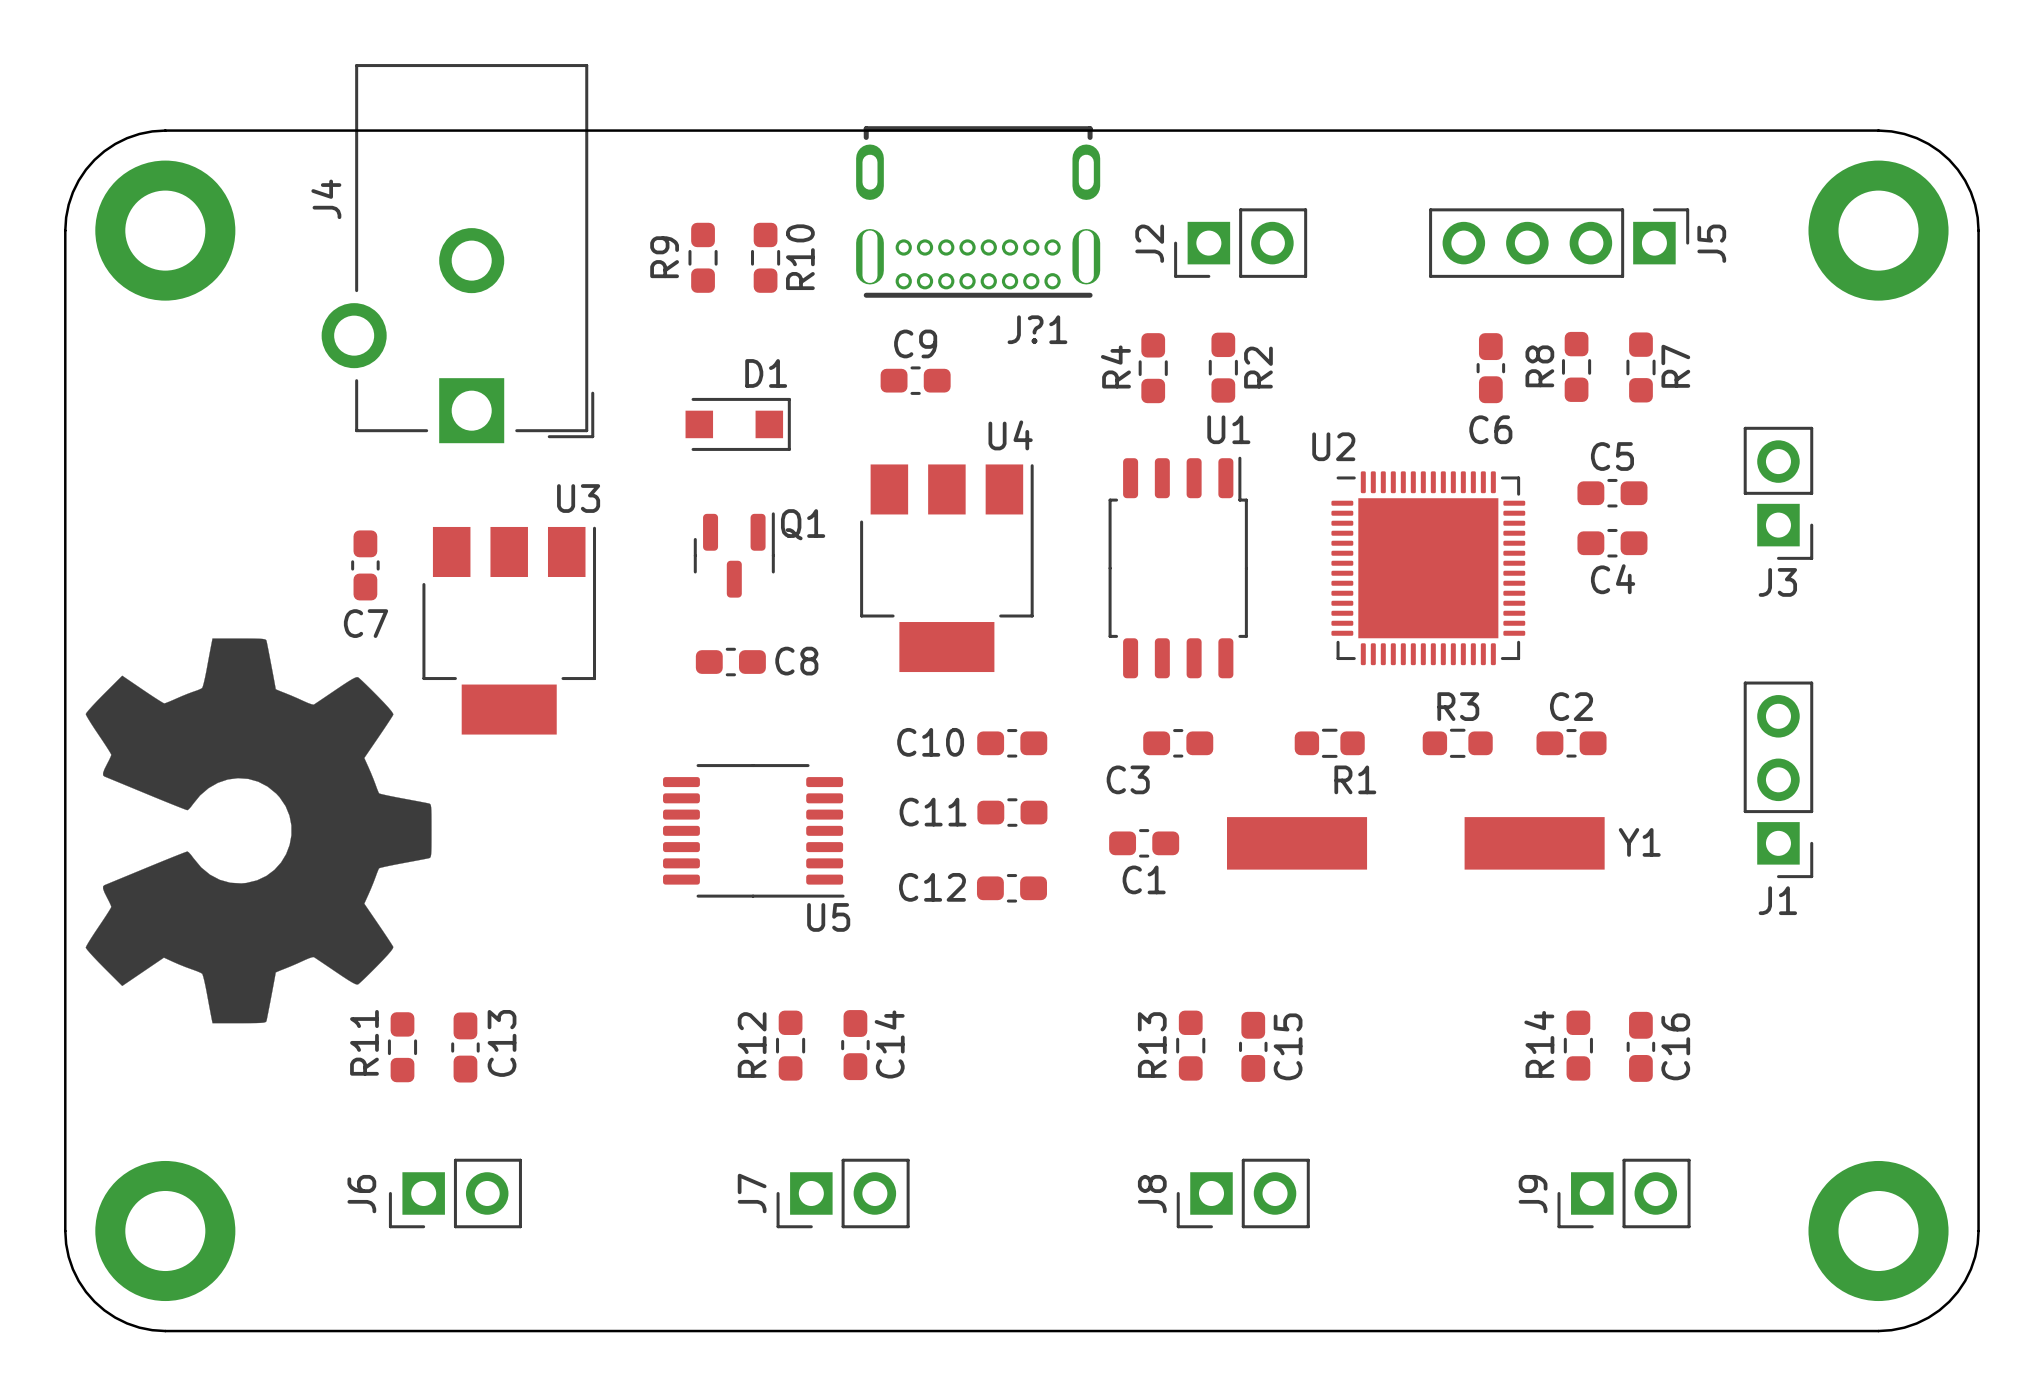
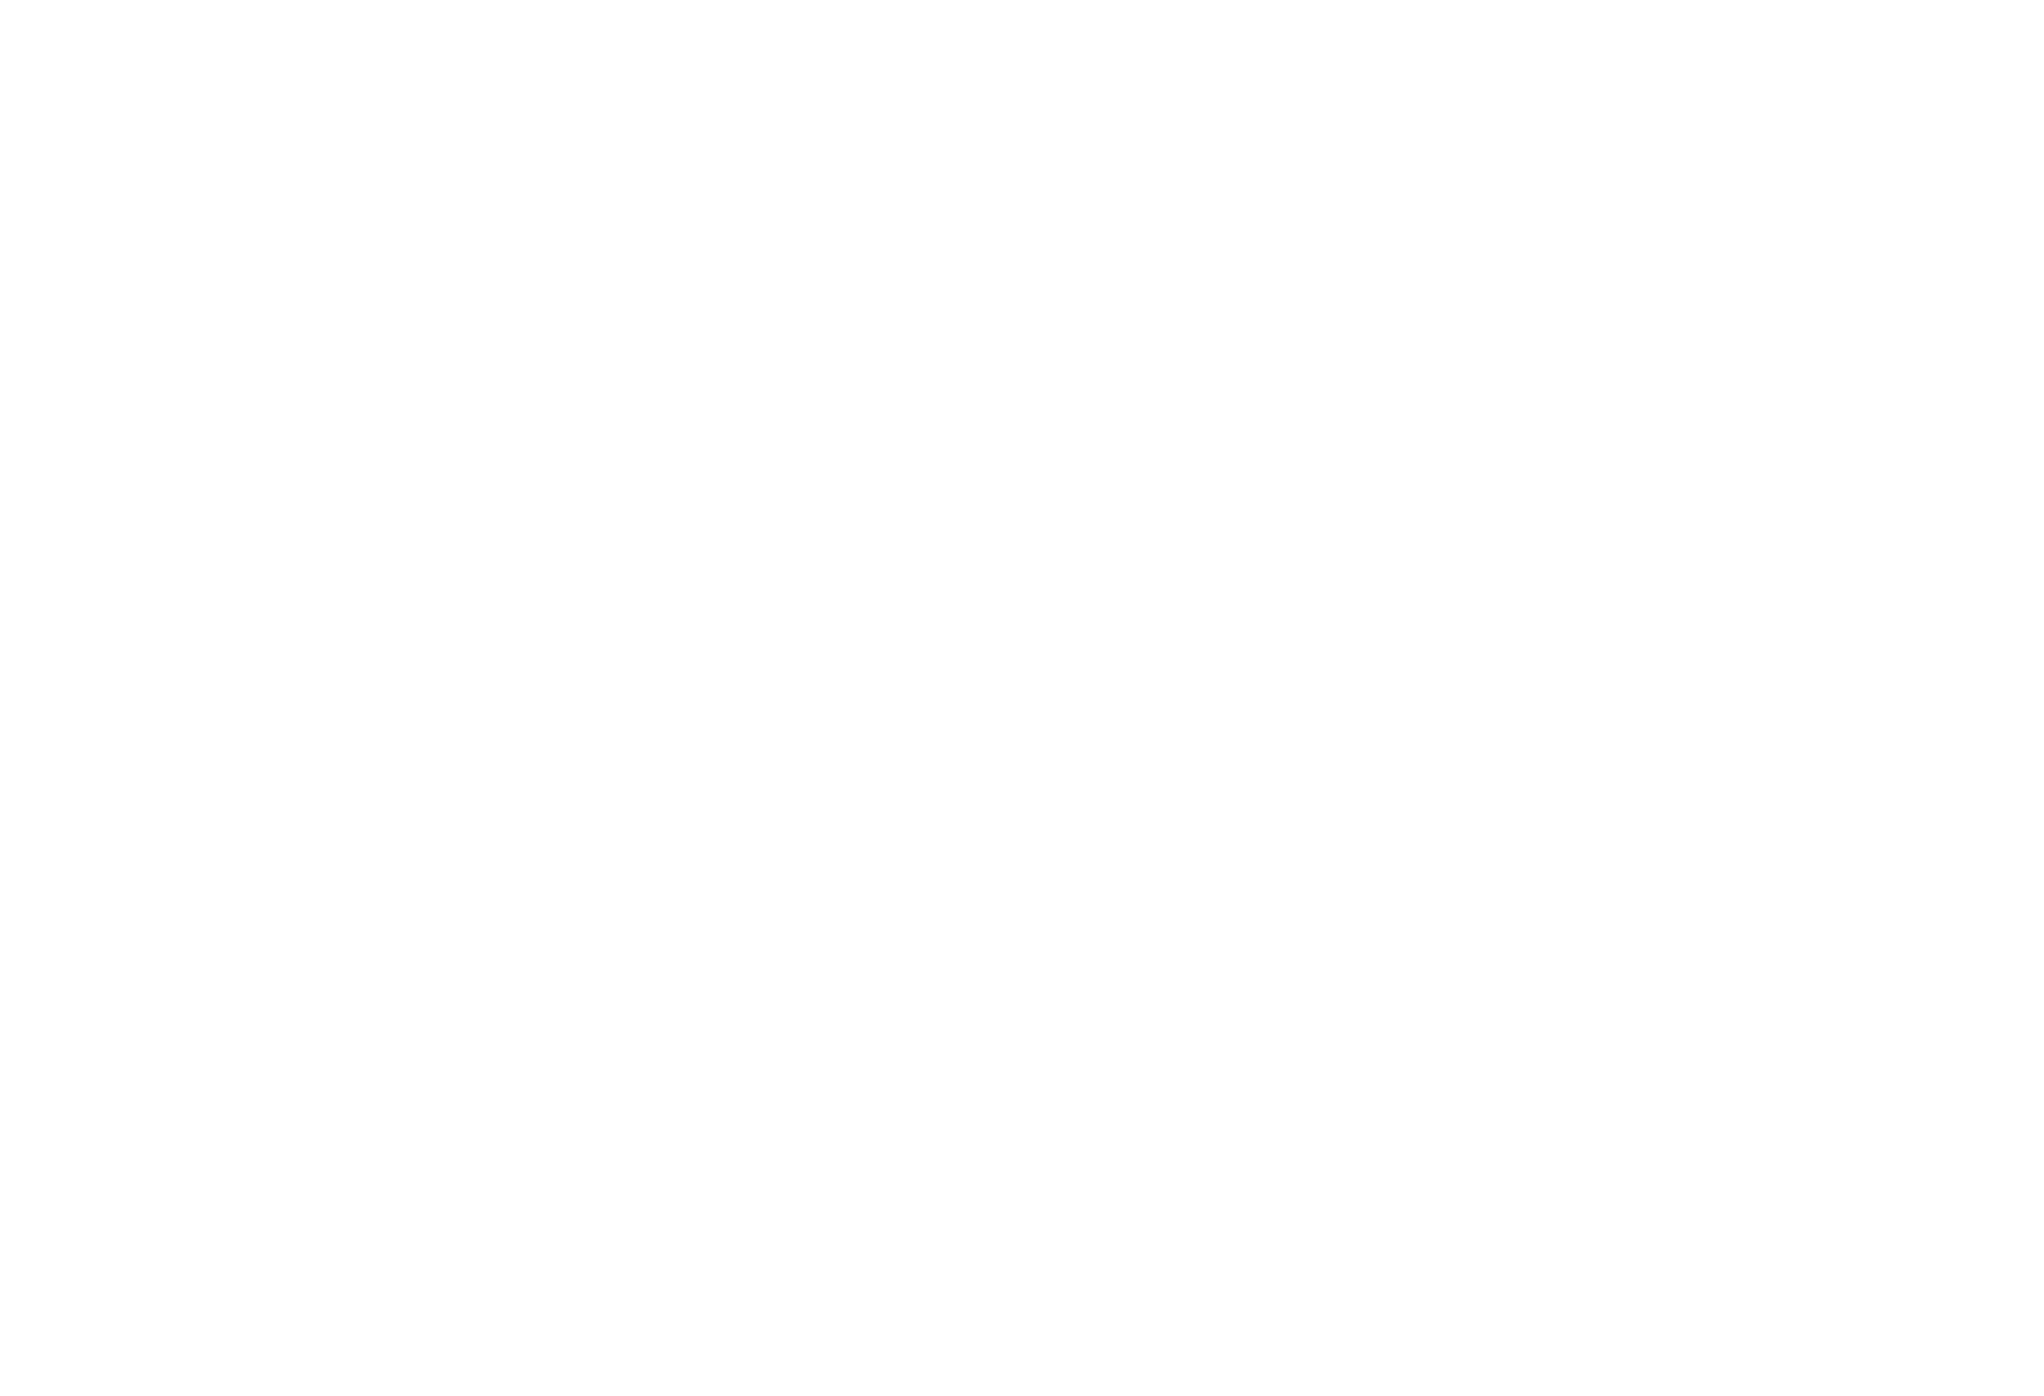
board edge: (165, 130) (1878, 130) (1904, 133) (1928, 143) (1949, 159) (1965, 180) (1975, 204) (1978, 230) (1978, 1231) (1975, 1256) (1965, 1281) (1949, 1301) (1928, 1317) (1904, 1327) (1878, 1331) (165, 1331) (139, 1327) (115, 1317) (94, 1301) (78, 1281) (68, 1256) (65, 1231) (65, 230) (68, 204) (72, 192) (85, 169) (94, 159) (104, 151) (127, 138) (139, 133) (165, 130) -> none
J?1: (978, 211) -> none
part: (165, 230) -> none
part: (1878, 230) -> none
J2: (1240, 243) -> none
J5: (1559, 243) -> none
J4: (457, 253) -> none
R9: (703, 257) -> none
R10: (765, 257) -> none
R8: (1576, 366) -> none
R2: (1223, 367) -> none
R7: (1640, 367) -> none
R4: (1153, 368) -> none
C6: (1490, 368) -> none
C9: (915, 380) -> none
D1: (738, 424) -> none
C5: (1612, 493) -> none
J3: (1778, 493) -> none
C4: (1612, 543) -> none
Q1: (734, 554) -> none
C7: (365, 565) -> none
U1: (1178, 567) -> none
U4: (946, 568) -> none
U2: (1428, 568) -> none
U3: (509, 630) -> none
drawing: [85, 638, 432, 1024] -> none
C8: (730, 662) -> none
C10: (1012, 743) -> none
C3: (1178, 743) -> none
R1: (1329, 743) -> none
R3: (1457, 743) -> none
C2: (1571, 743) -> none
J1: (1778, 779) -> none
C11: (1012, 812) -> none
U5: (753, 830) -> none
C1: (1144, 843) -> none
Y1: (1415, 843) -> none
C12: (1011, 888) -> none
R12: (790, 1045) -> none
C14: (855, 1045) -> none
R13: (1190, 1045) -> none
R14: (1578, 1045) -> none
C15: (1253, 1046) -> none
C16: (1640, 1046) -> none
R11: (402, 1047) -> none
C13: (465, 1047) -> none
J6: (455, 1193) -> none
J7: (843, 1193) -> none
J8: (1243, 1193) -> none
J9: (1624, 1193) -> none
part: (165, 1231) -> none
part: (1878, 1231) -> none

